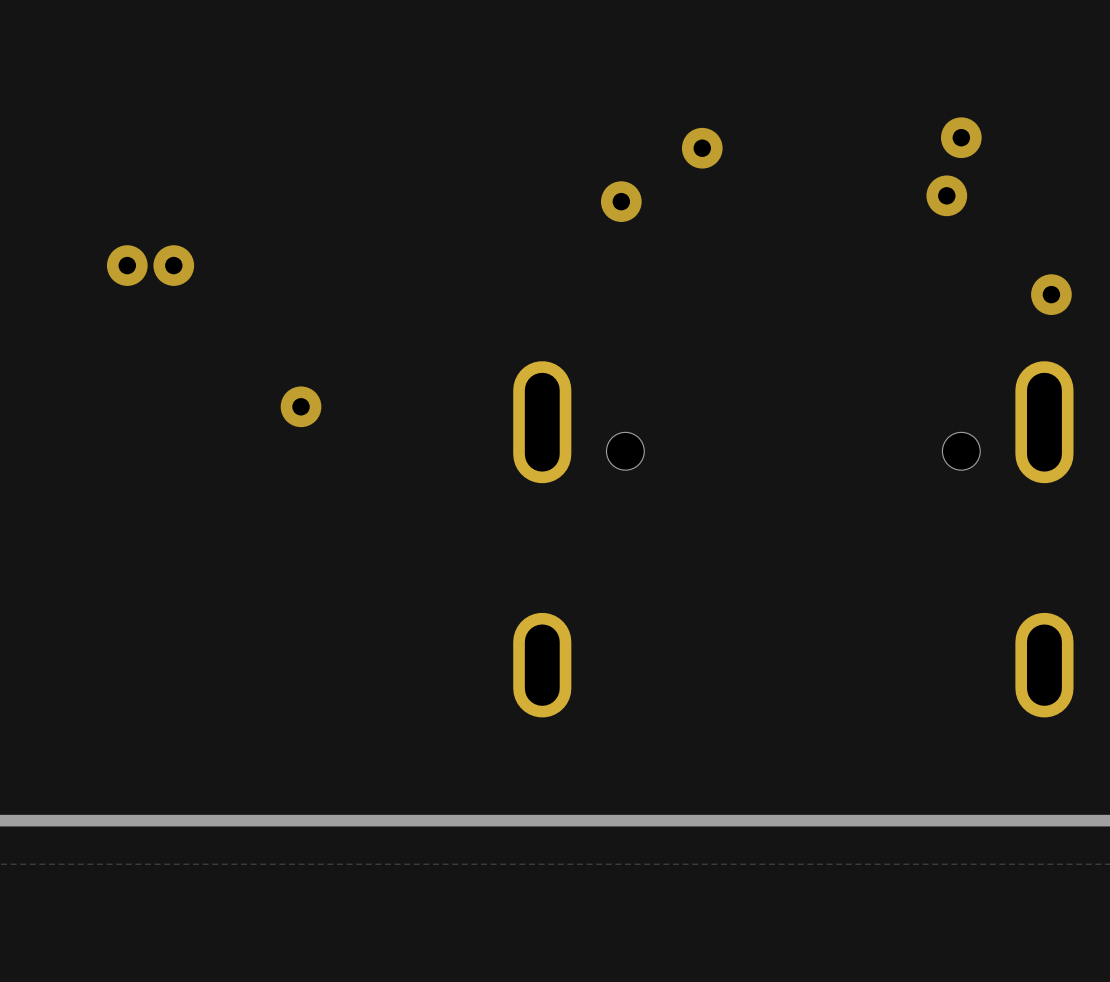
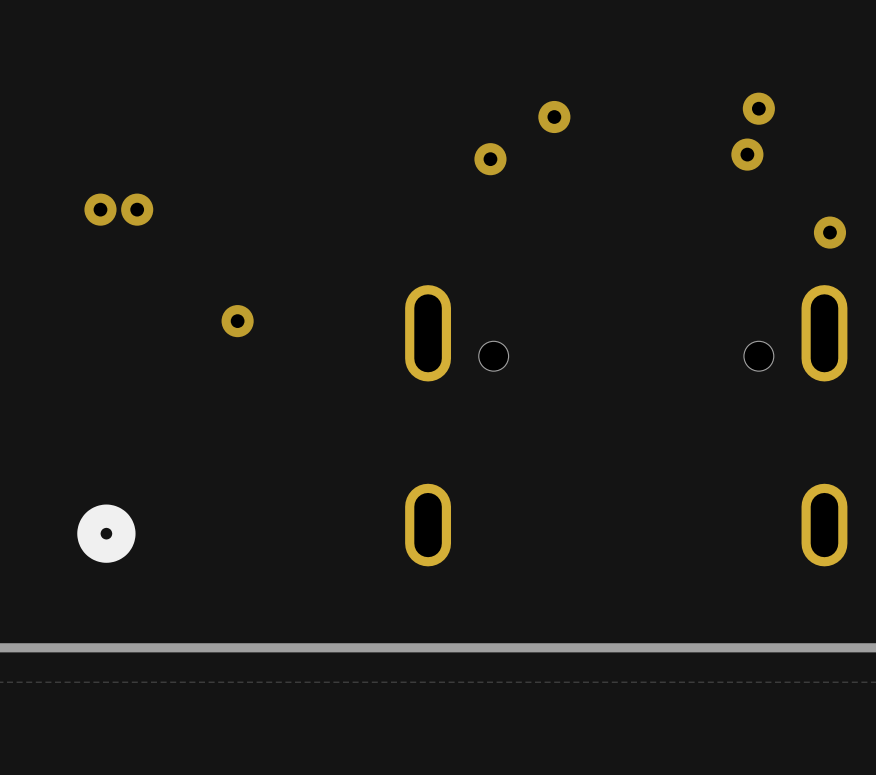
part: none -> (106, 533)

